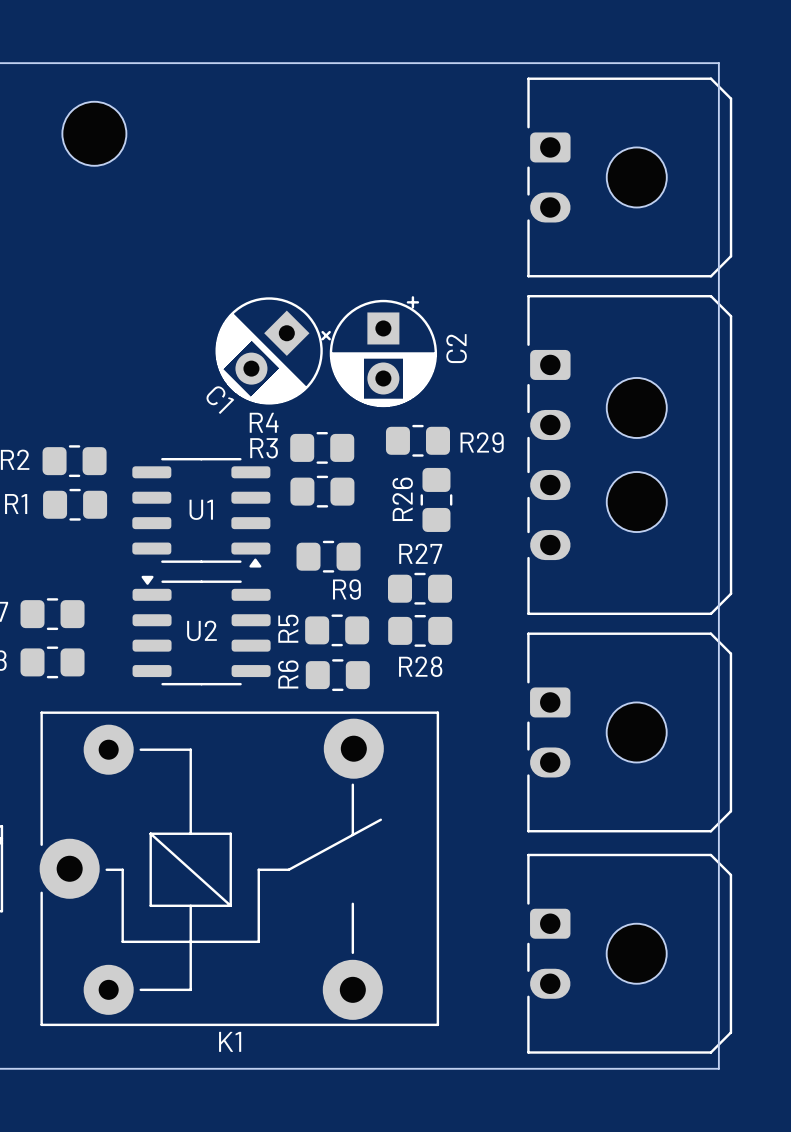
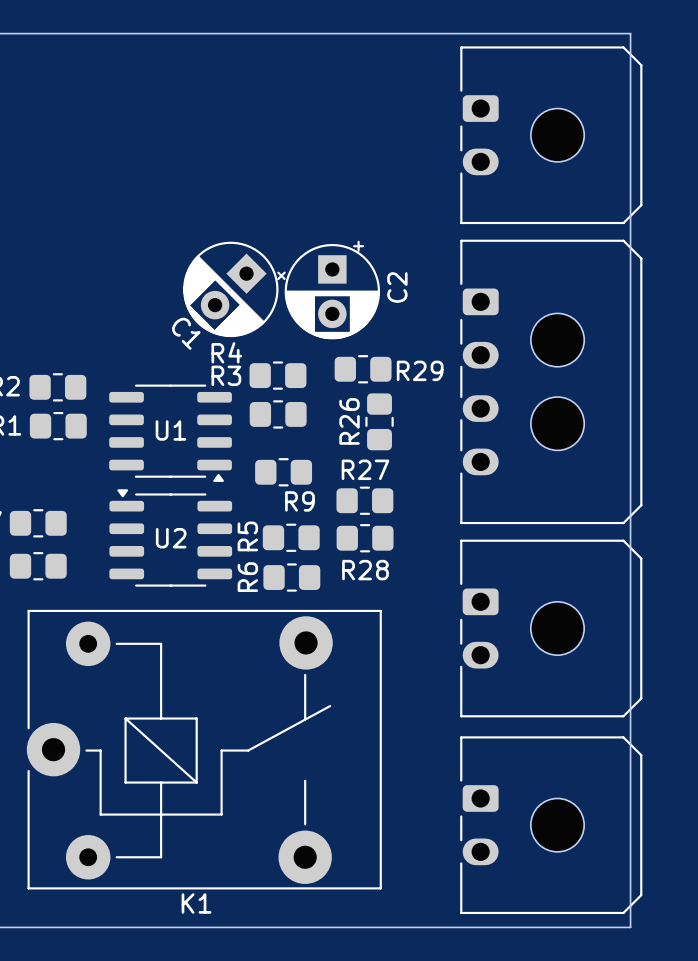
part: (94, 133) -> none

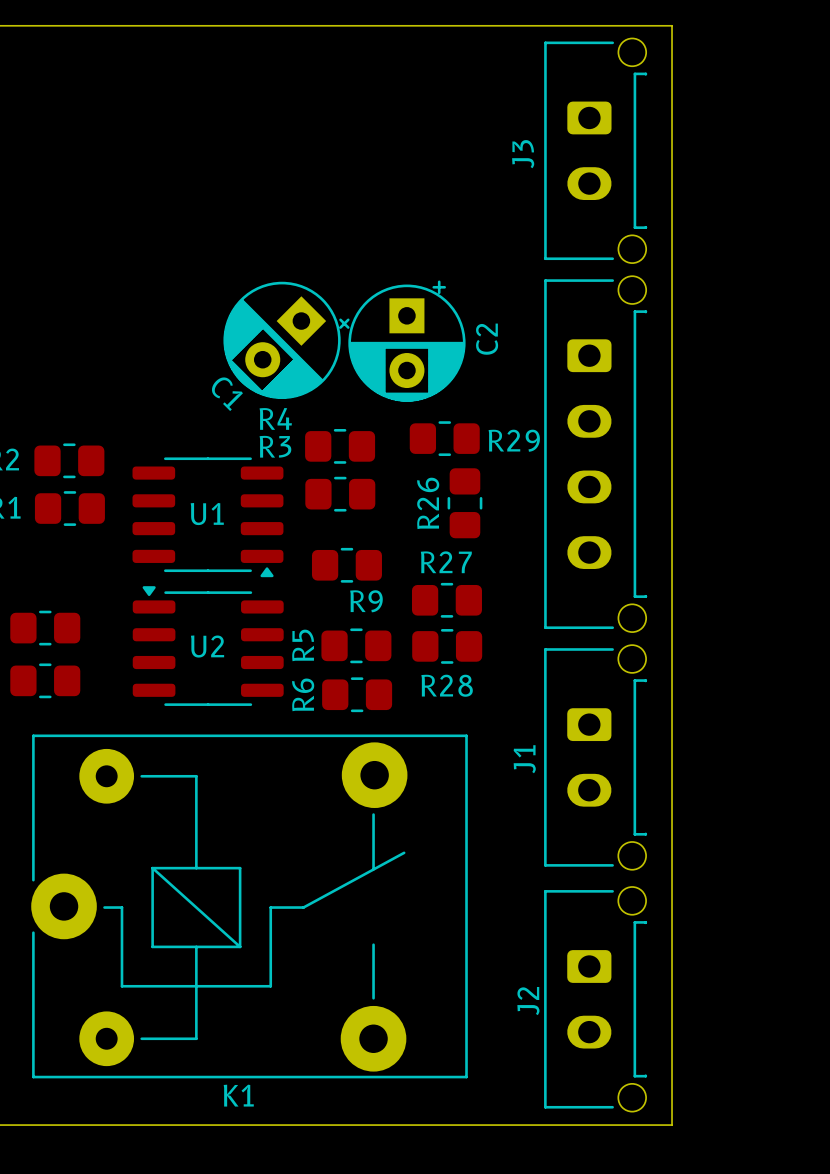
board edge: (547, 33) (630, 33) (630, 927) (547, 927) -> (672, 25) (672, 1125)
J3: none -> (595, 150)
part: (551, 135) -> none
part: none -> (595, 454)
part: (551, 381) -> none
J1: none -> (595, 757)
part: (551, 628) -> none
J2: none -> (595, 999)
part: (551, 825) -> none

